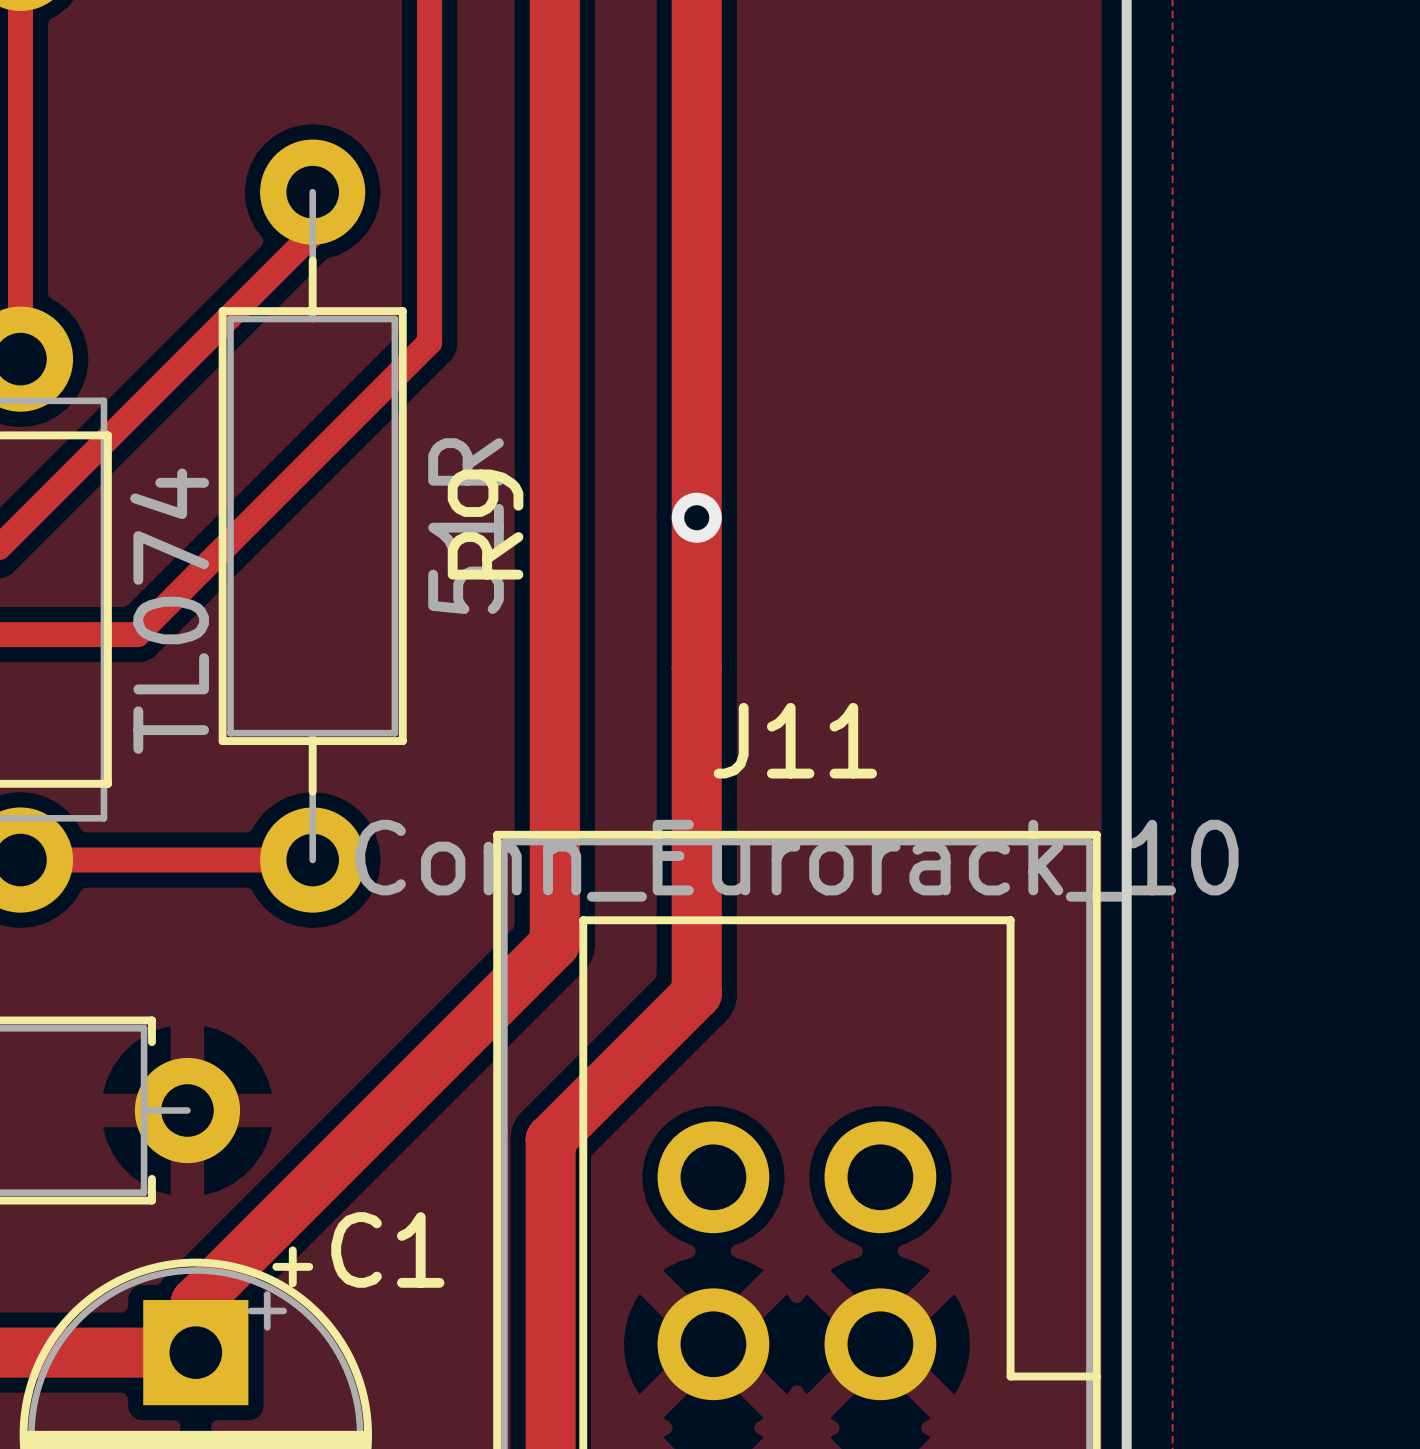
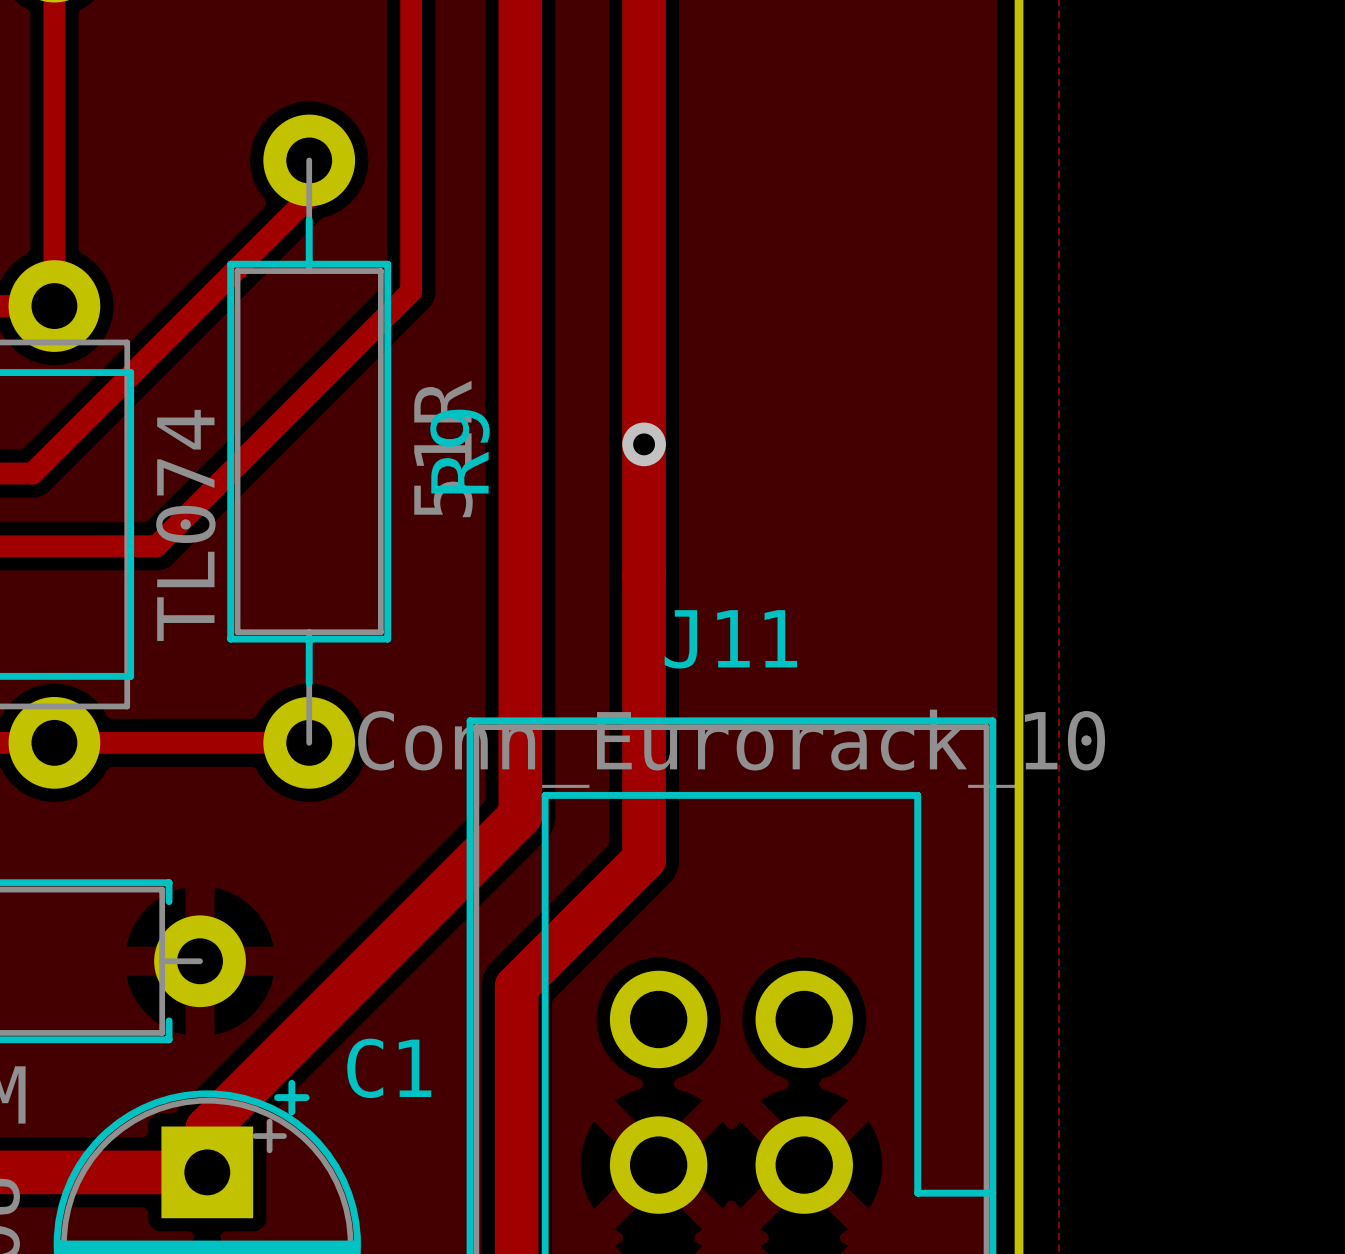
C1 name position: C1 (387, 1249) -> C1 (389, 1068)

